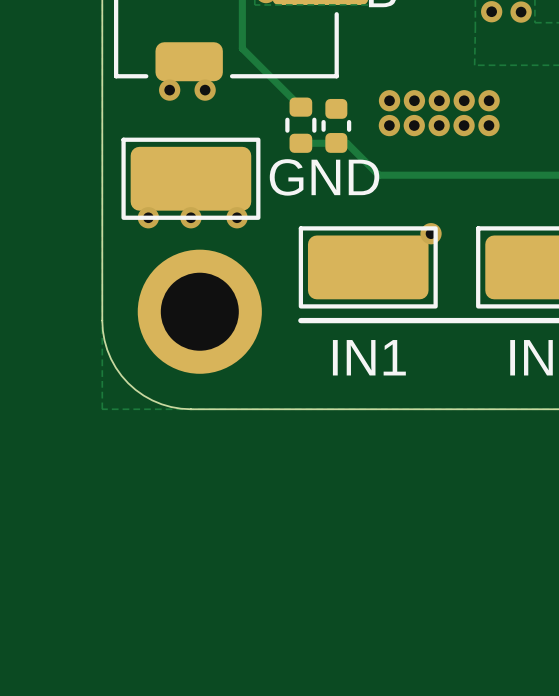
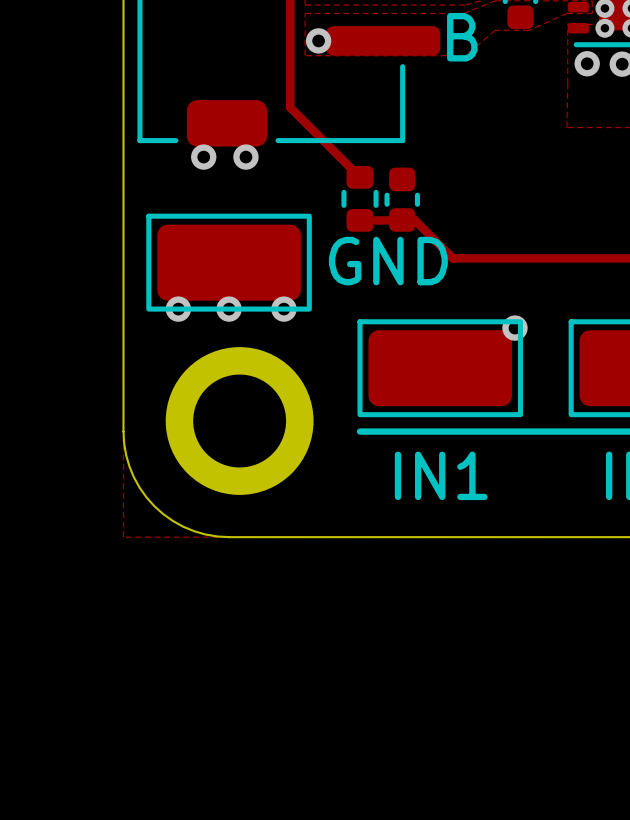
via: (389, 100) -> none
via: (414, 100) -> none
via: (439, 100) -> none
via: (464, 100) -> none
via: (489, 100) -> none
via: (389, 125) -> none
via: (414, 125) -> none
via: (439, 125) -> none
via: (464, 125) -> none
via: (488, 125) -> none

